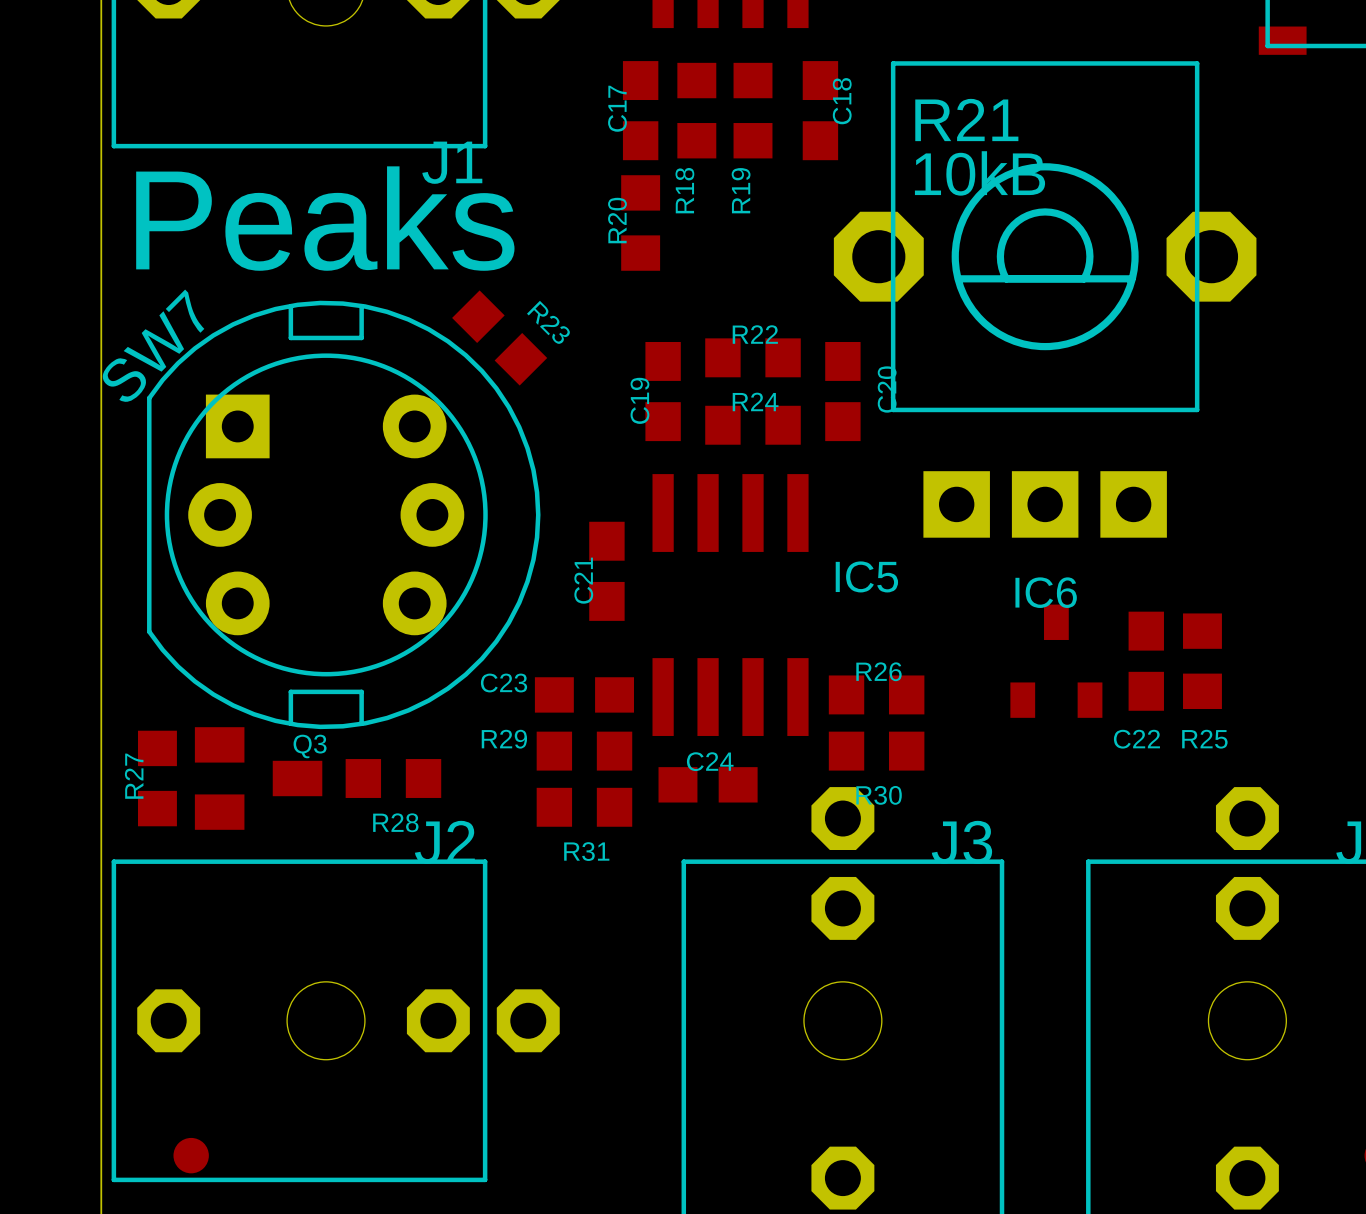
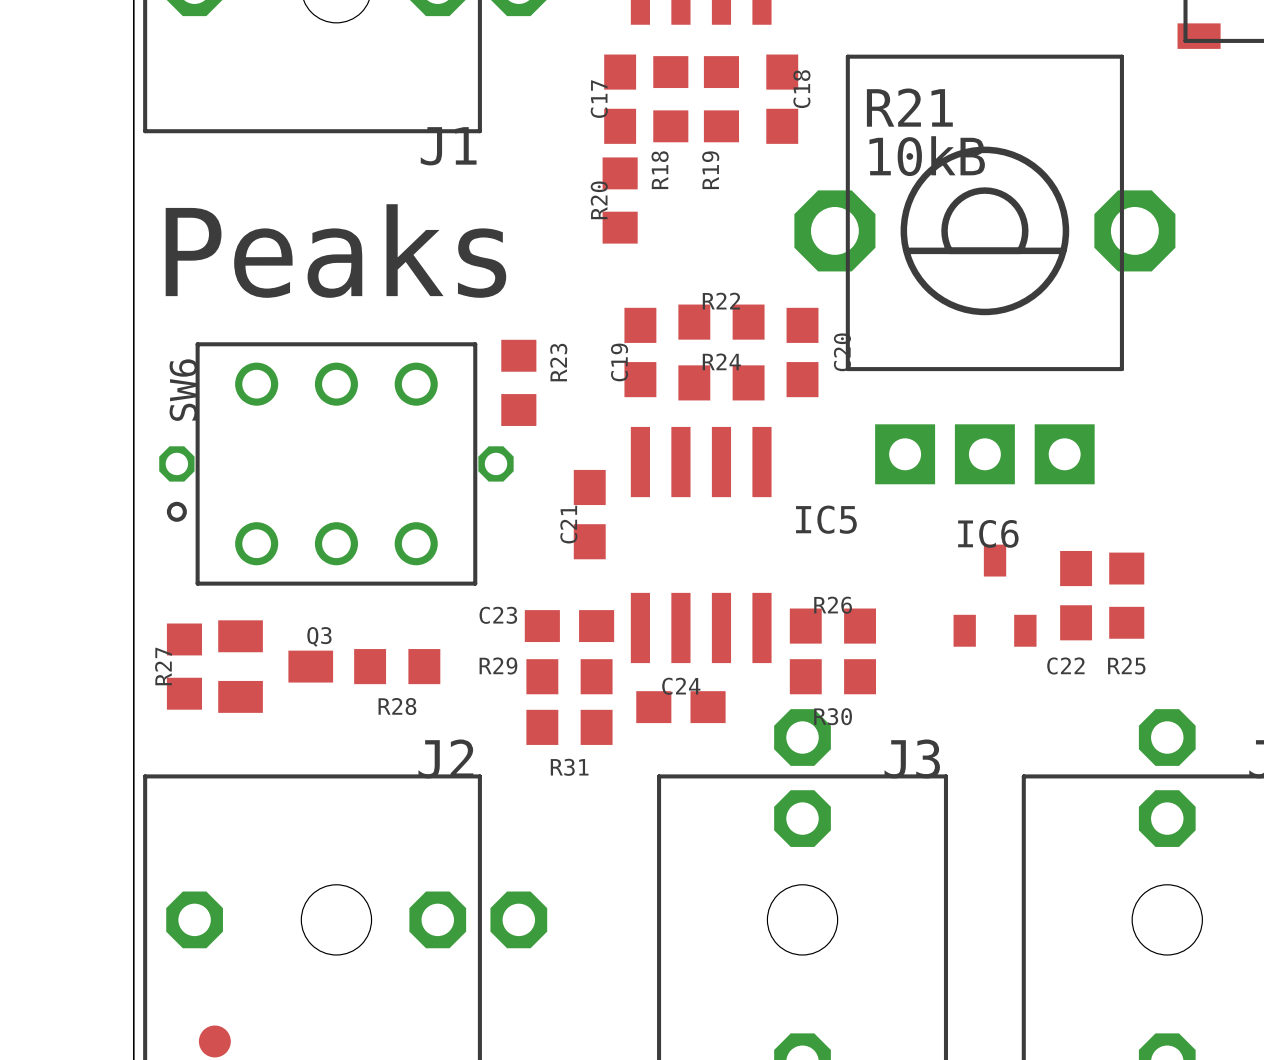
text position: Peaks (325, 218) -> Peaks (335, 251)
R23 rotation: 0° (499, 337) -> 45° clockwise (518, 382)
R23 position: (499, 337) -> (518, 382)
SW7: (343, 514) -> none
SW6: none -> (336, 463)
R27 position: (157, 778) -> (184, 666)
Q3 position: (258, 778) -> (275, 666)
R28 position: (393, 778) -> (397, 666)

